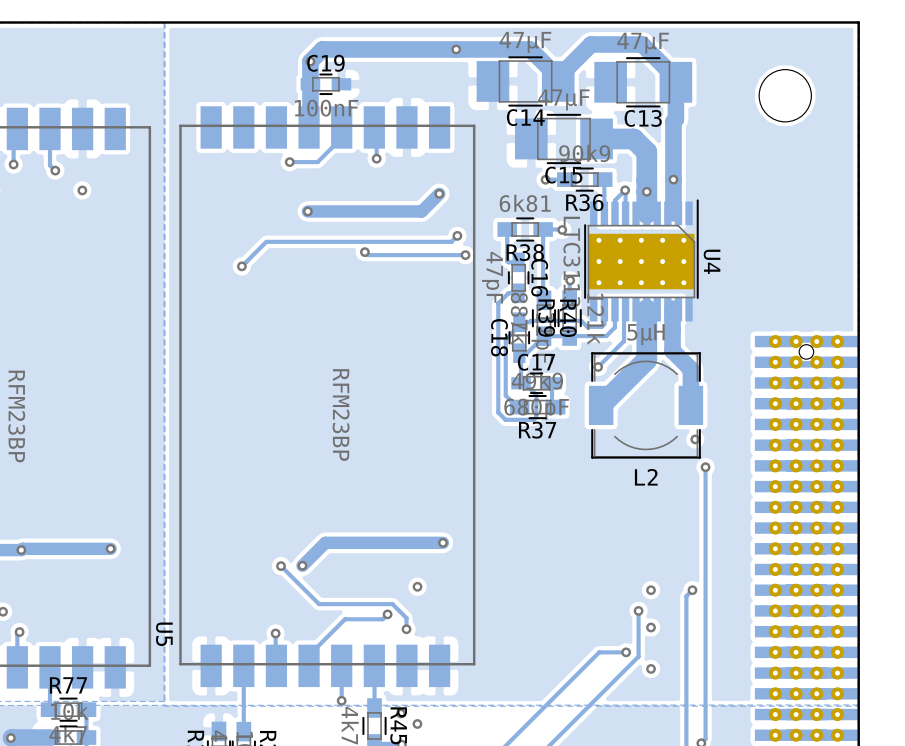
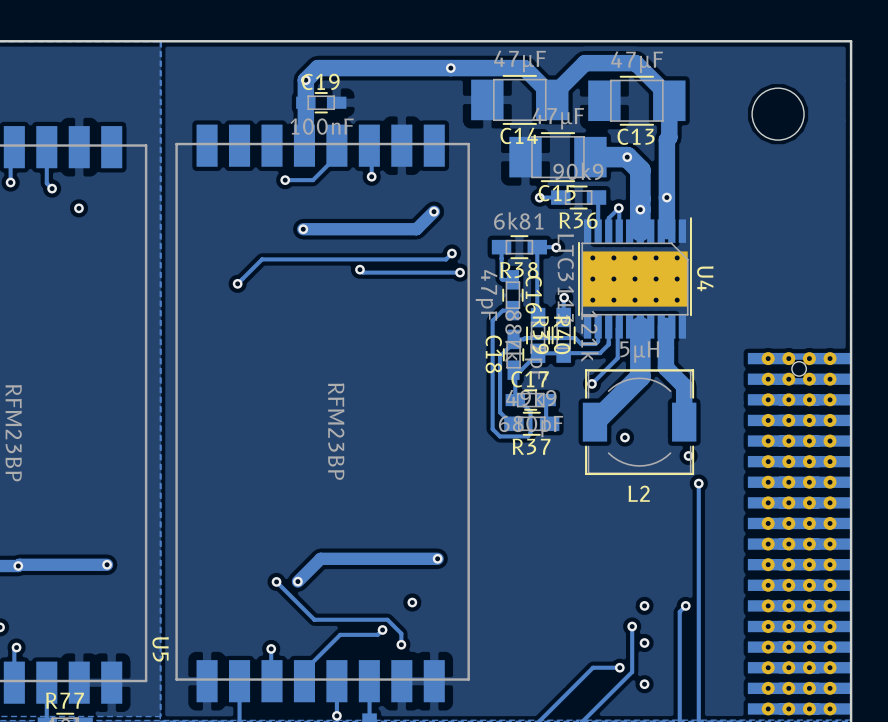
via: none -> (627, 157)
via: none -> (624, 437)

